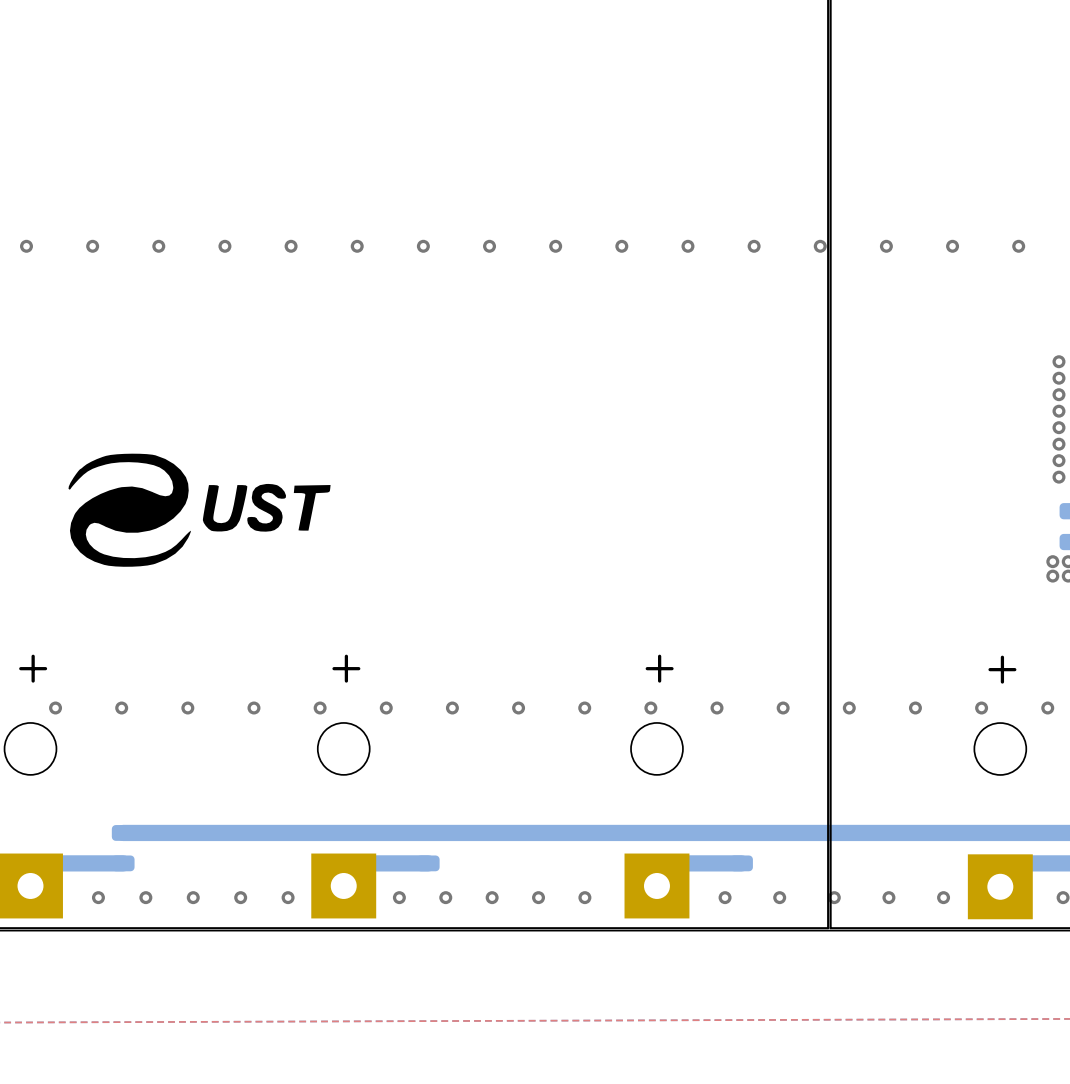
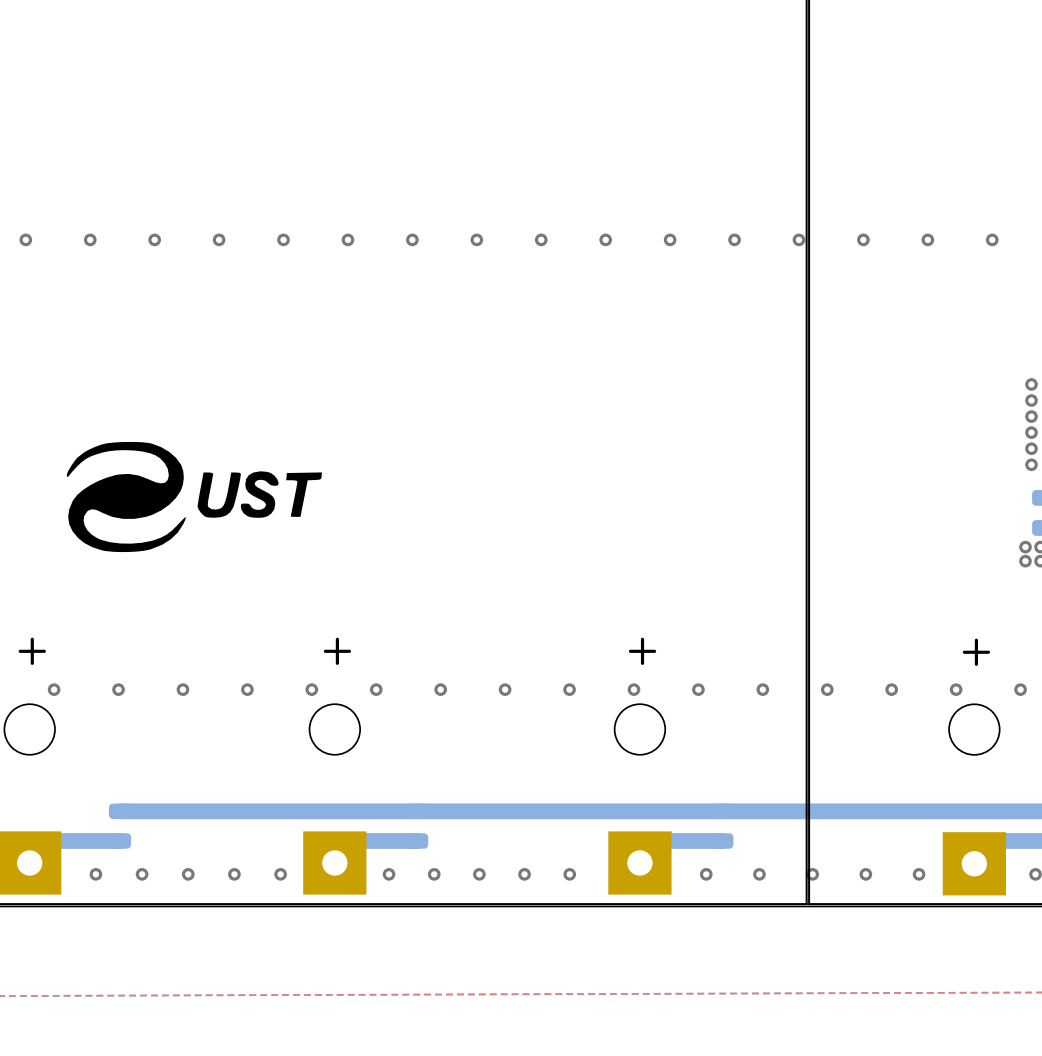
via: (1058, 361) -> none
via: (1058, 378) -> none

